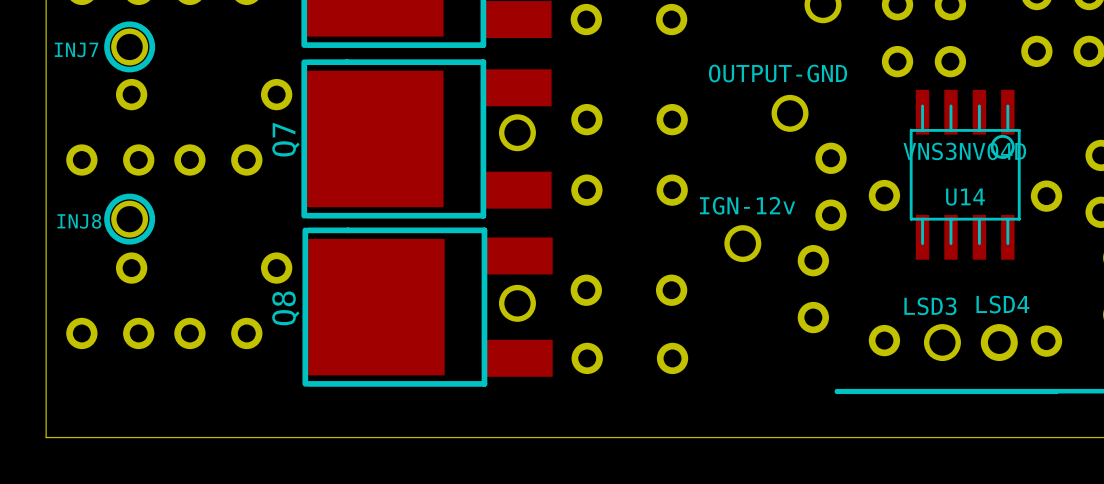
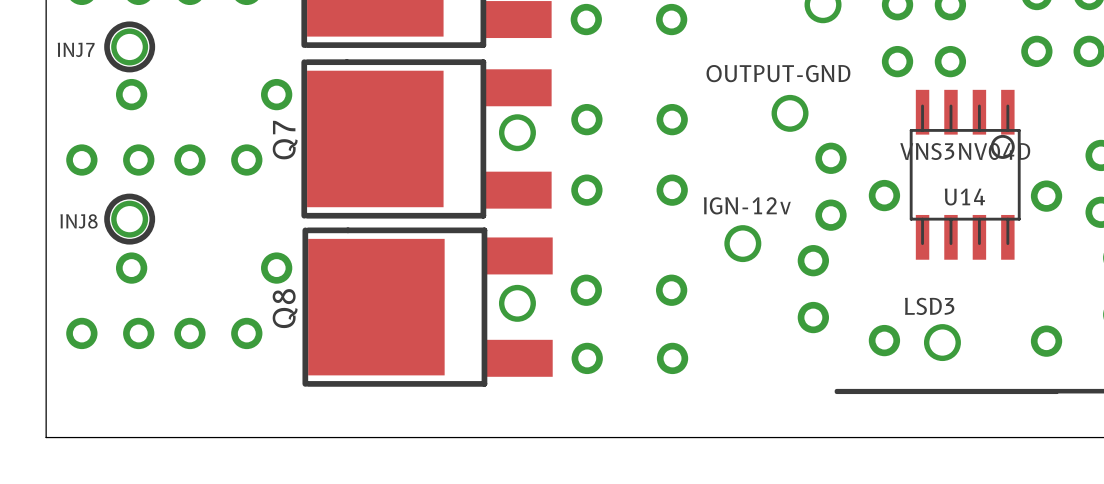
text: LSD4 (1002, 304) -> none
part: (999, 342) -> none

